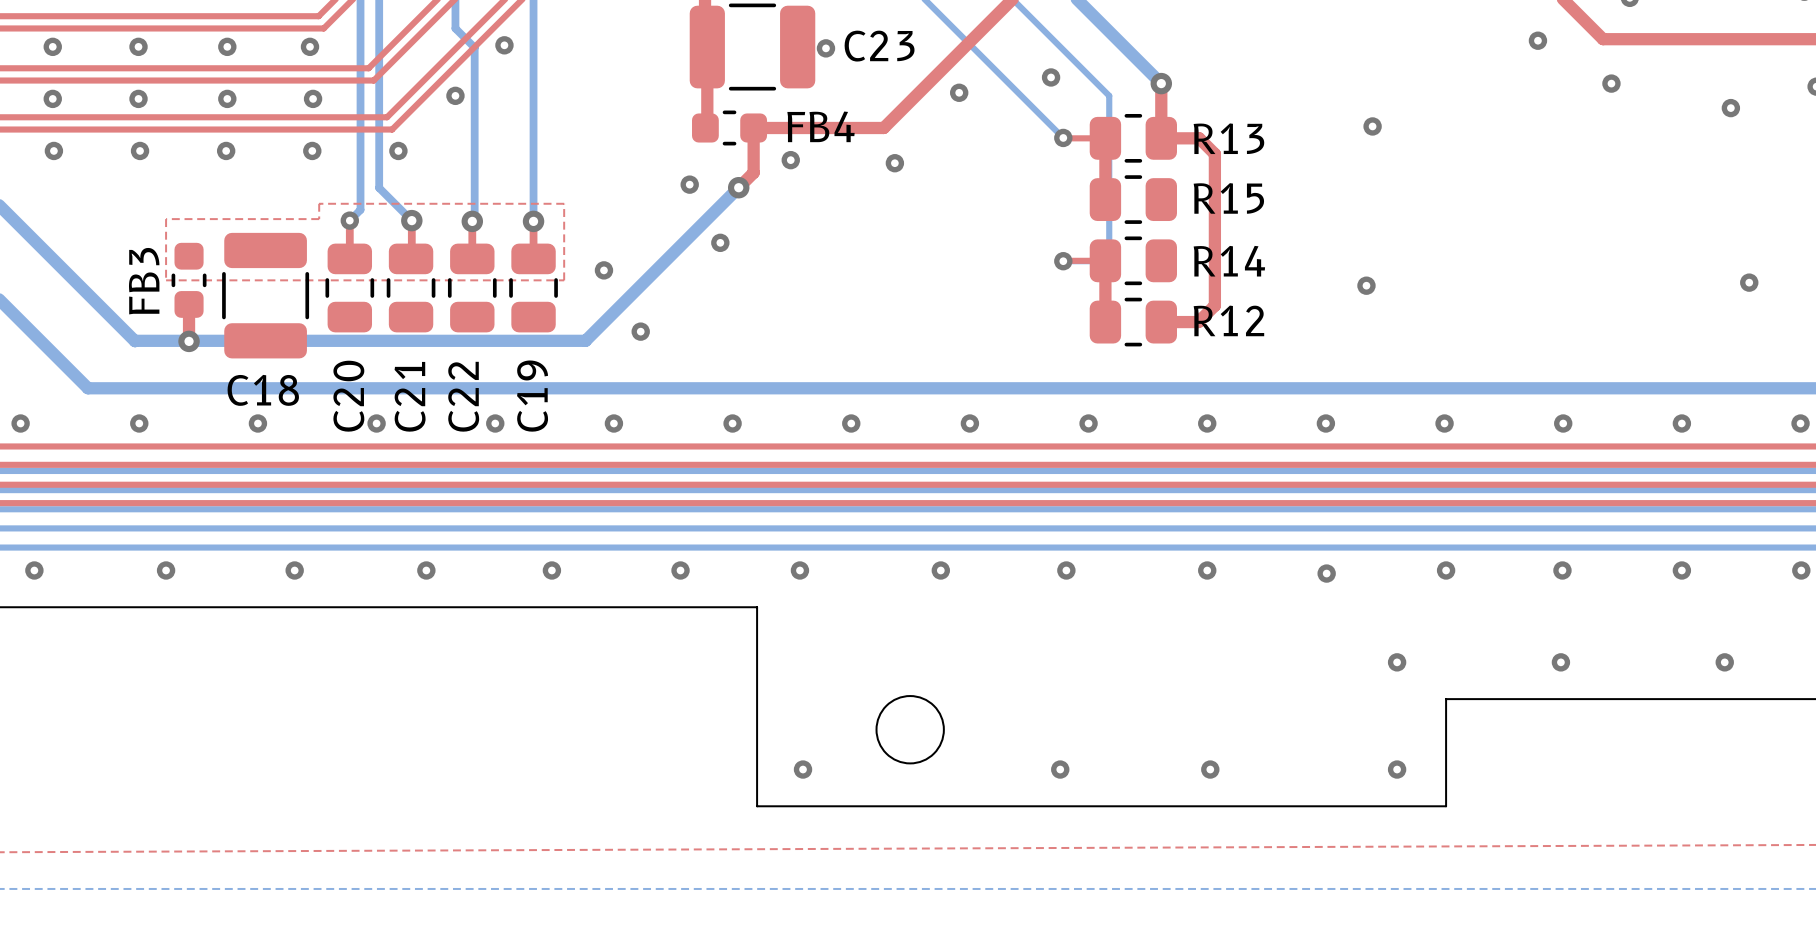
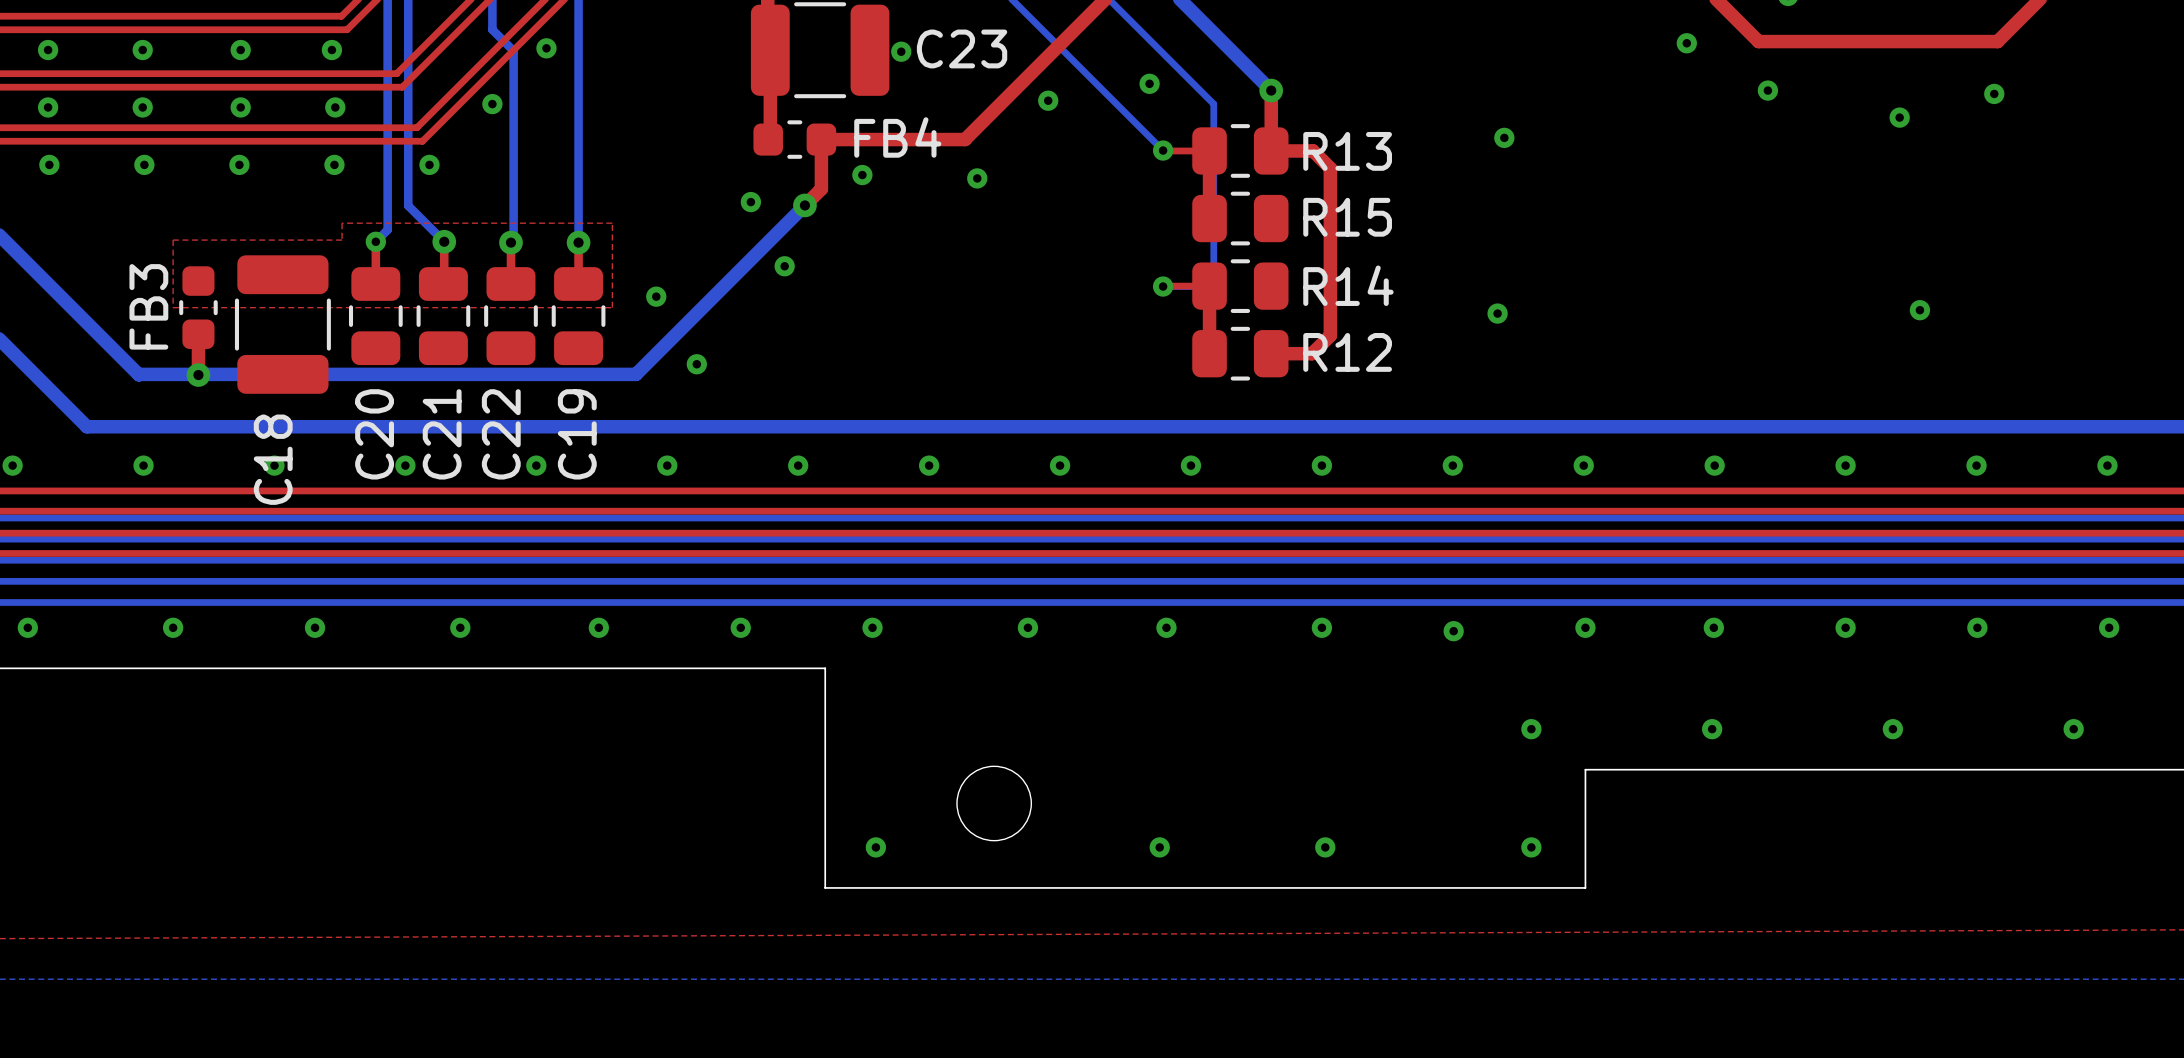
C18 name rotation: 0° (263, 390) -> 90° counterclockwise (273, 459)

